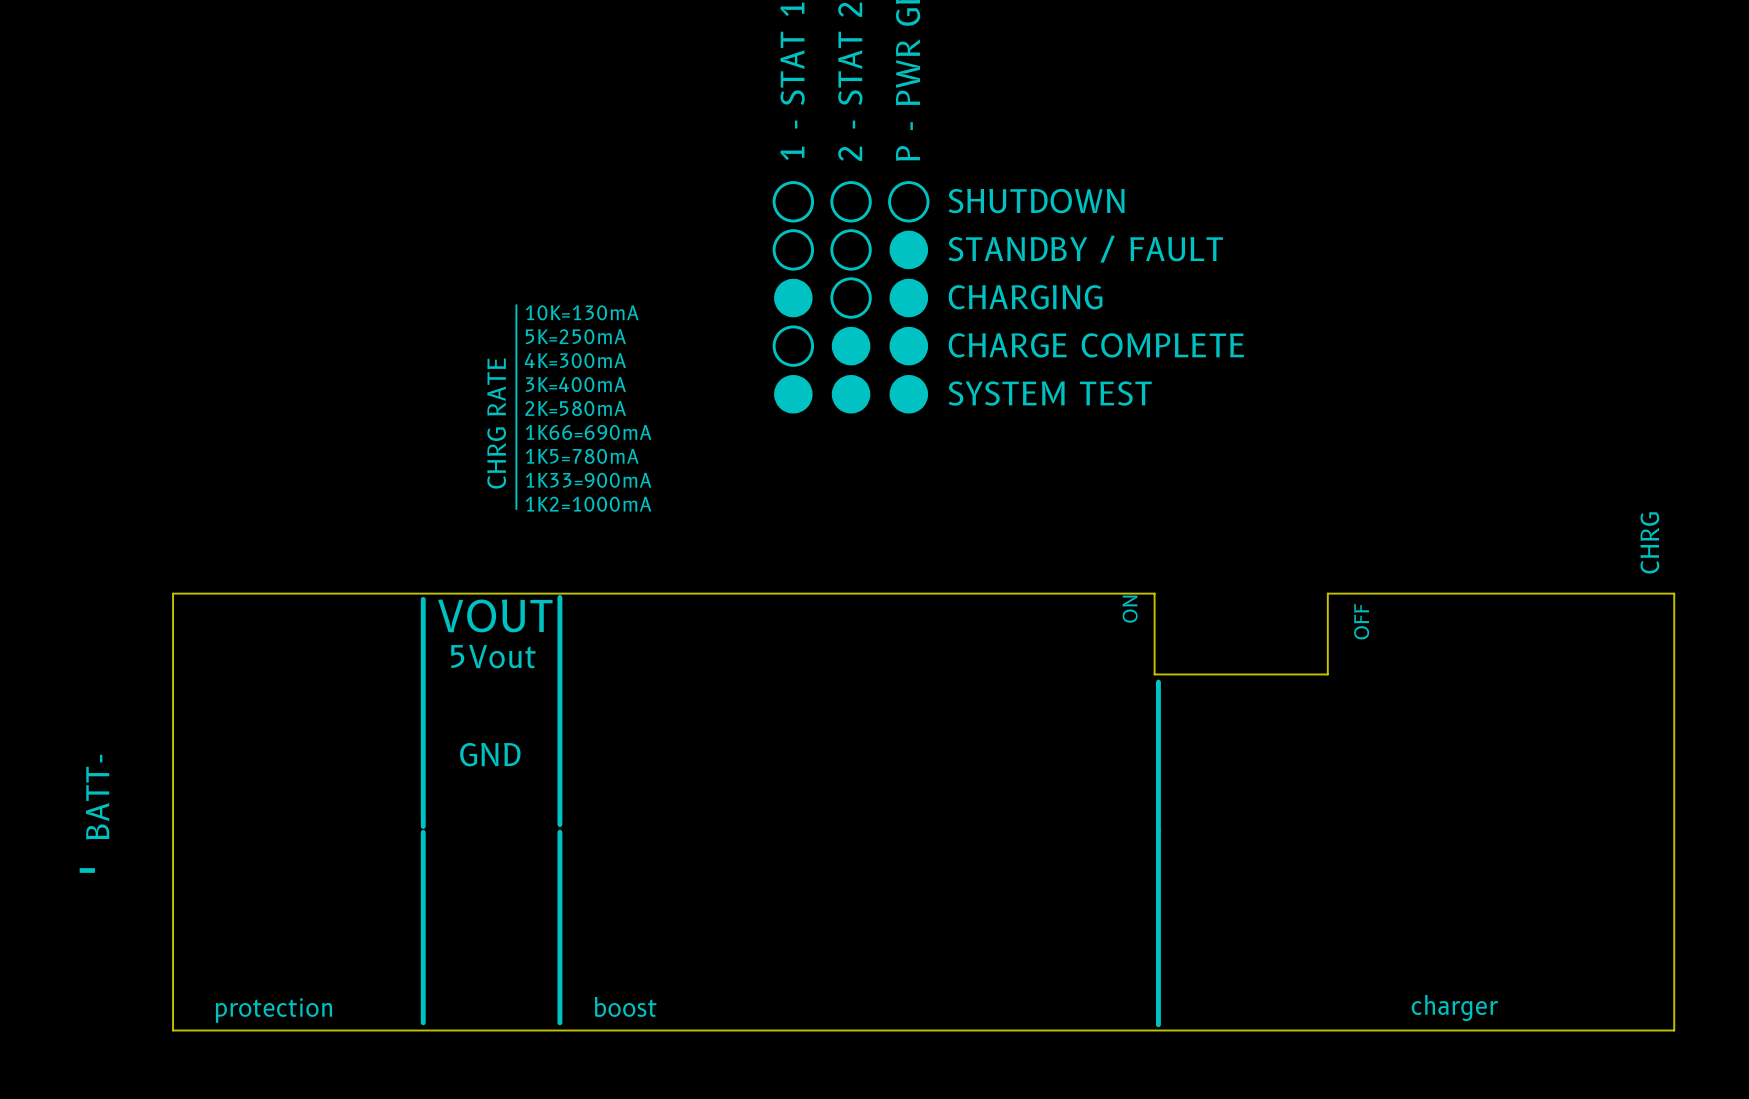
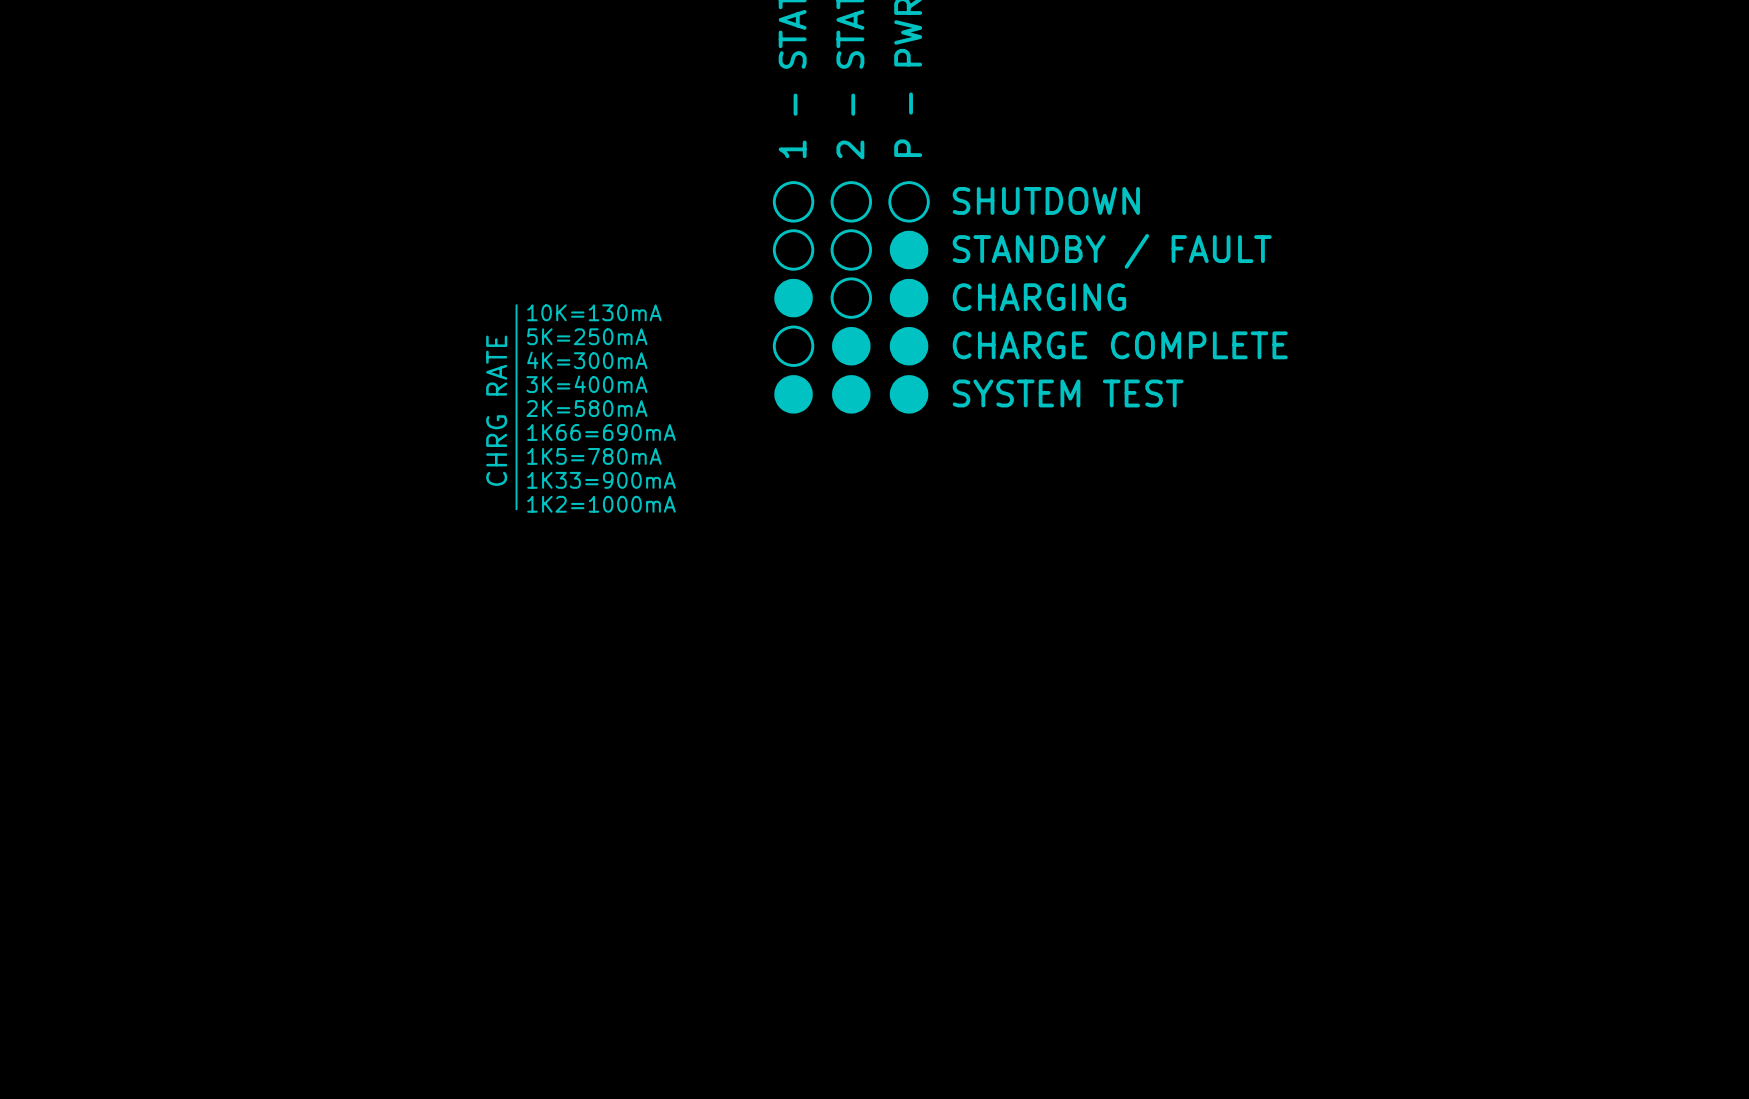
text: CHRG (1649, 542) -> none
board edge: (173, 593) (1154, 593) (1154, 674) (1327, 674) (1327, 593) (1674, 593) (1674, 1030) (173, 1030) (173, 593) -> none
line: (559, 597) (559, 824) -> none
line: (423, 599) (423, 826) -> none
text: ON (1130, 609) -> none
text: VOUT (495, 615) -> none
text: OFF (1361, 621) -> none
text: 5Vout (493, 656) -> none
line: (1158, 682) (1158, 830) -> none
text: GND (490, 754) -> none
text: BATT- (97, 797) -> none
line: (423, 832) (423, 1022) -> none
line: (559, 832) (559, 1022) -> none
line: (1158, 832) (1158, 1024) -> none
text: - (87, 870) -> none
text: boost (625, 1006) -> none
text: charger (1454, 1008) -> none
text: protection (273, 1010) -> none

